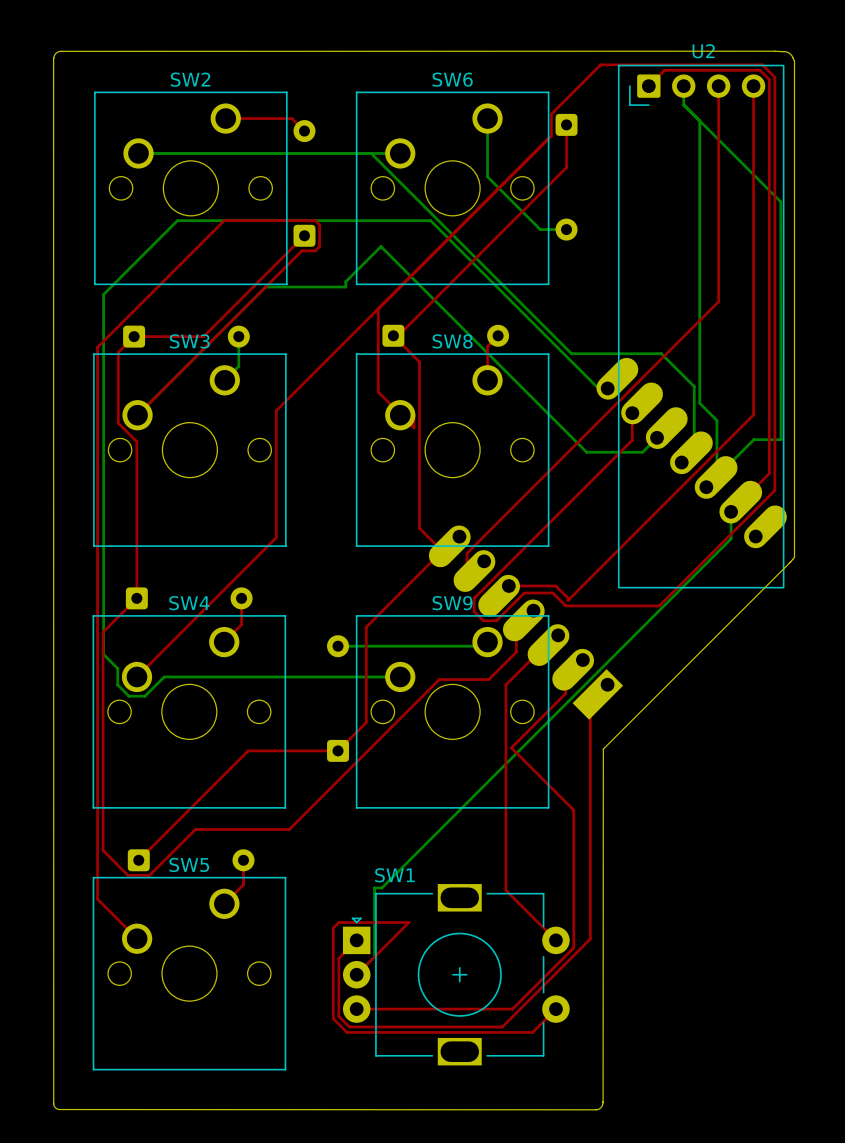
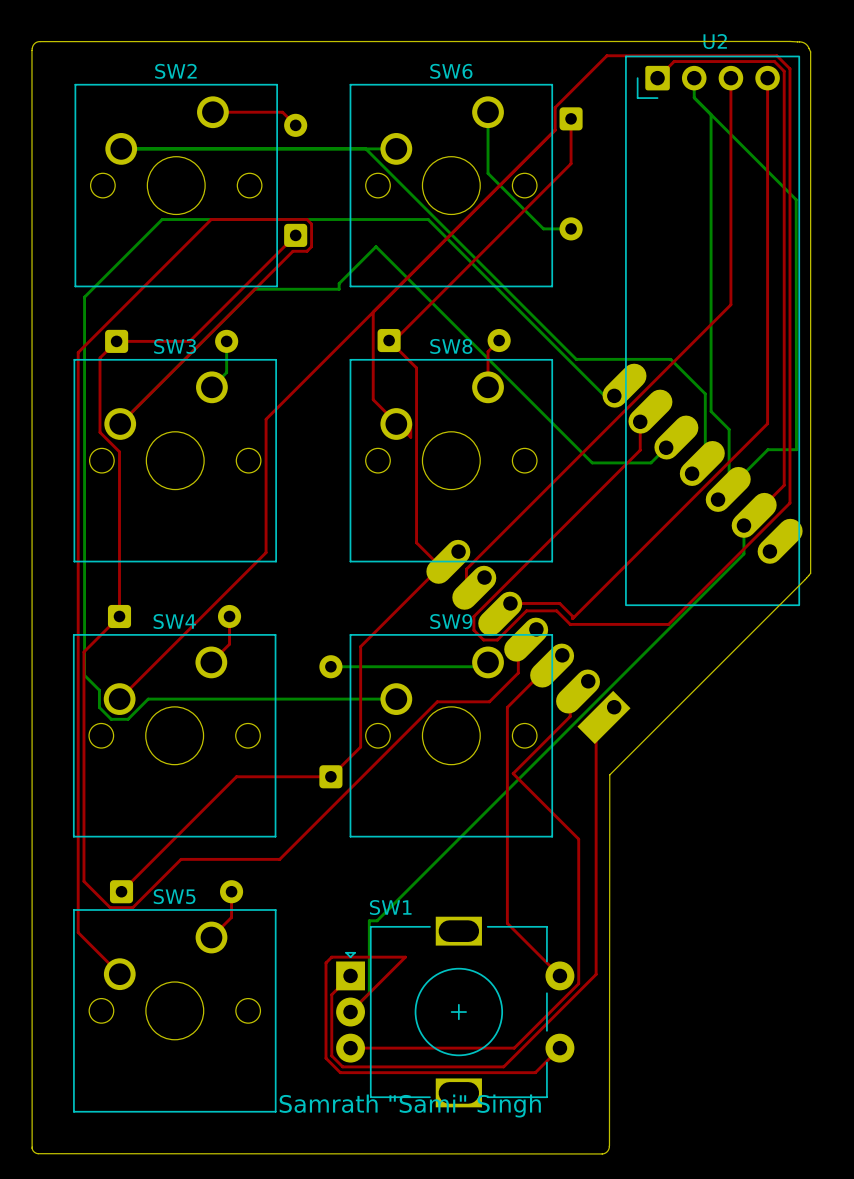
text: none -> Samrath "Sami" Singh (410, 1106)

